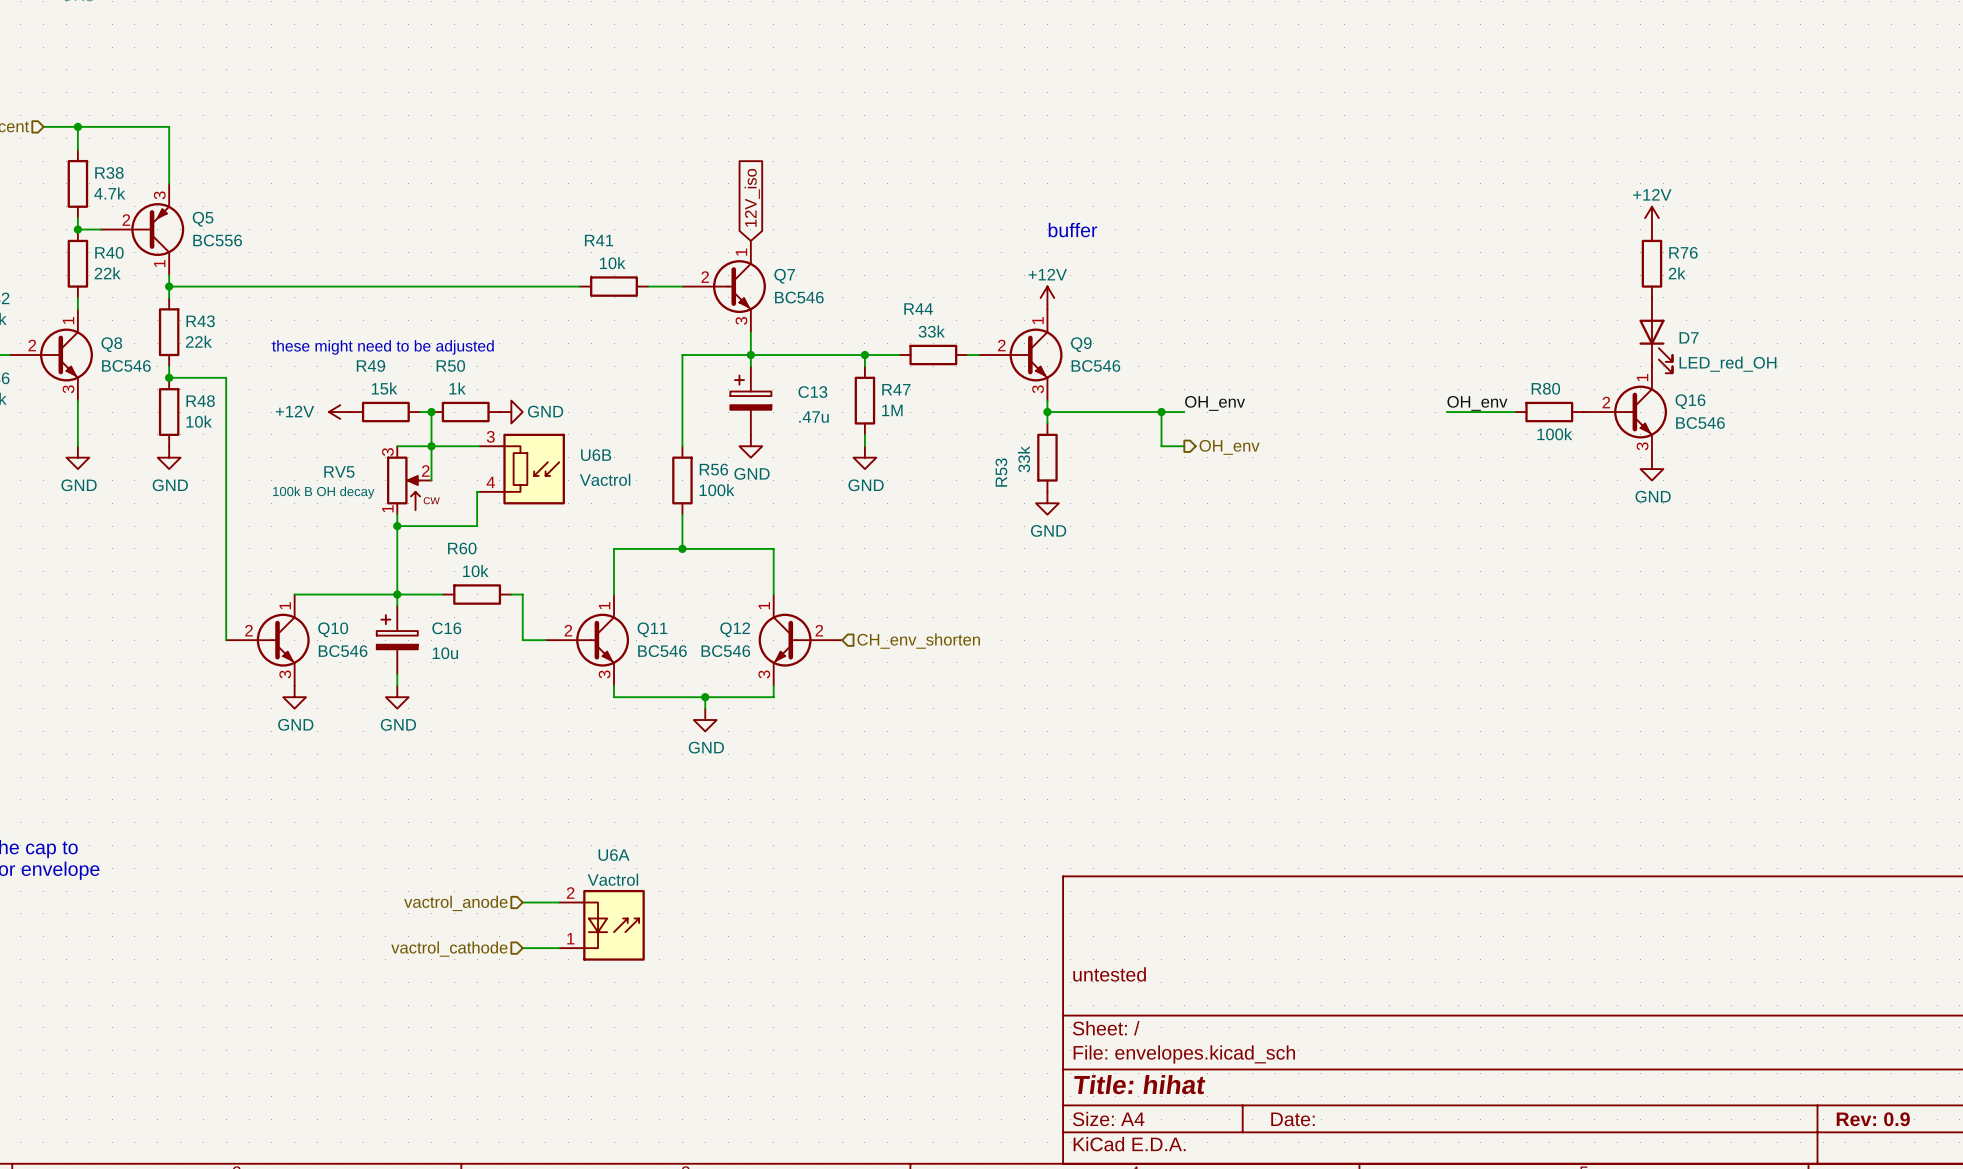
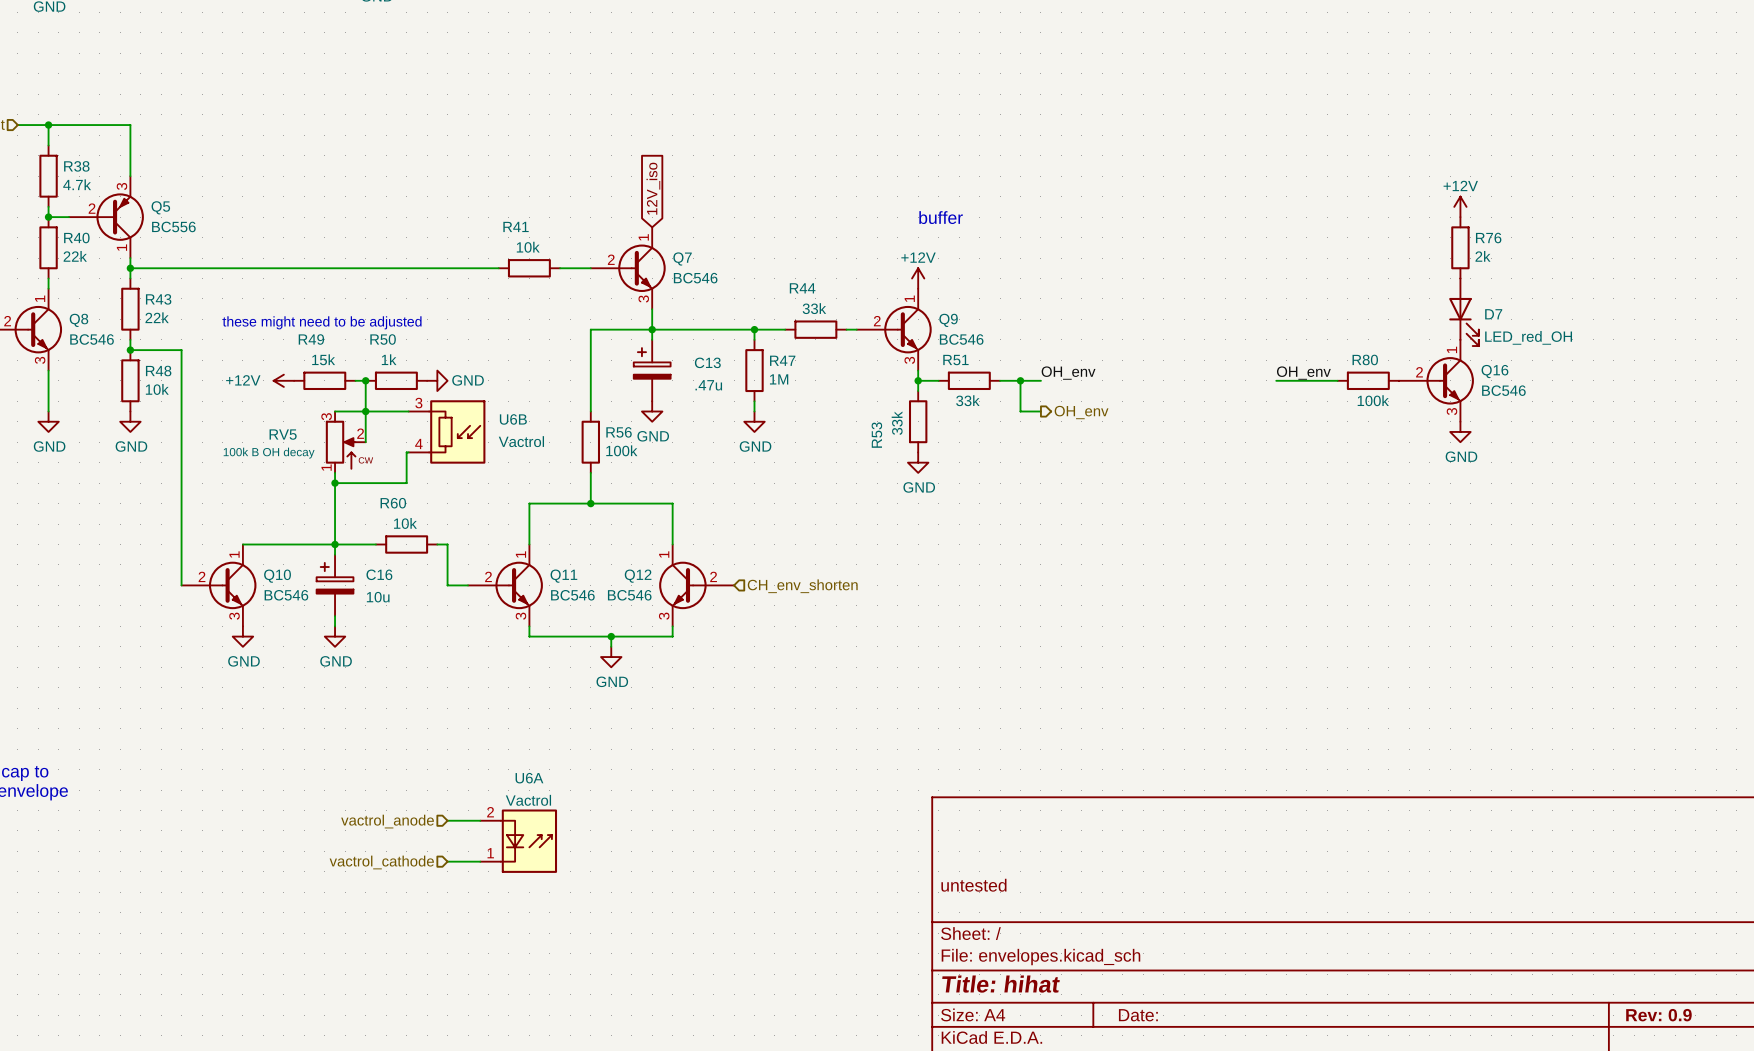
wire: (1070, 412) (1138, 412) -> none
R51: none -> 33k (969, 380)

